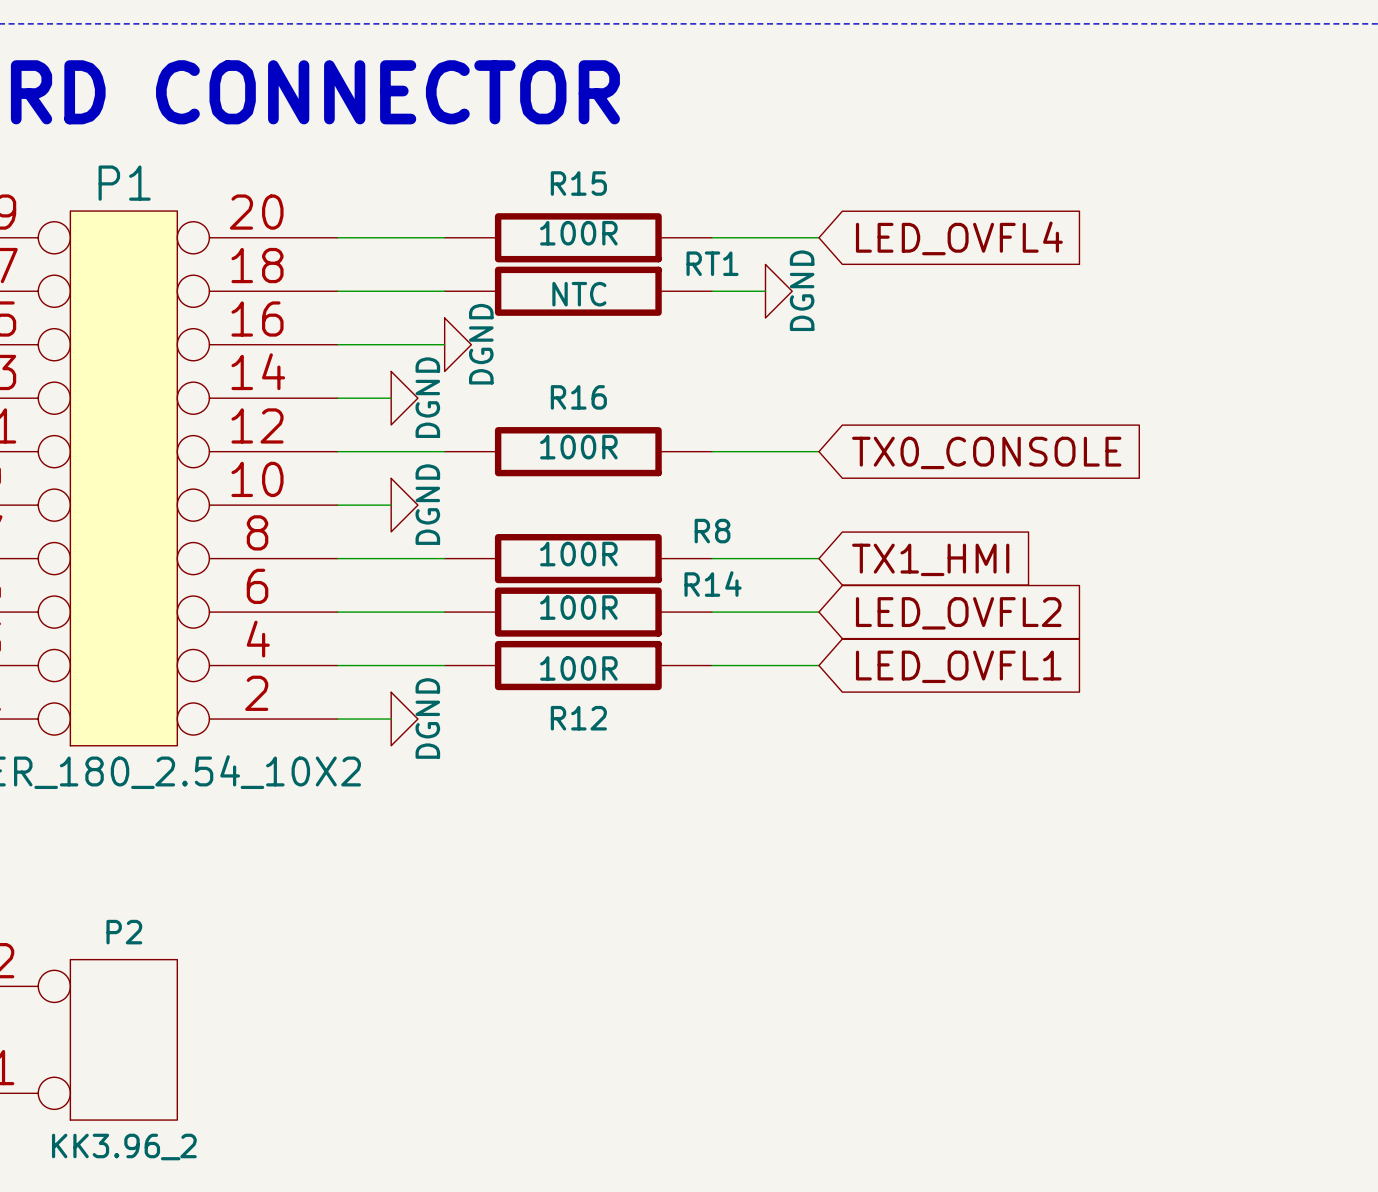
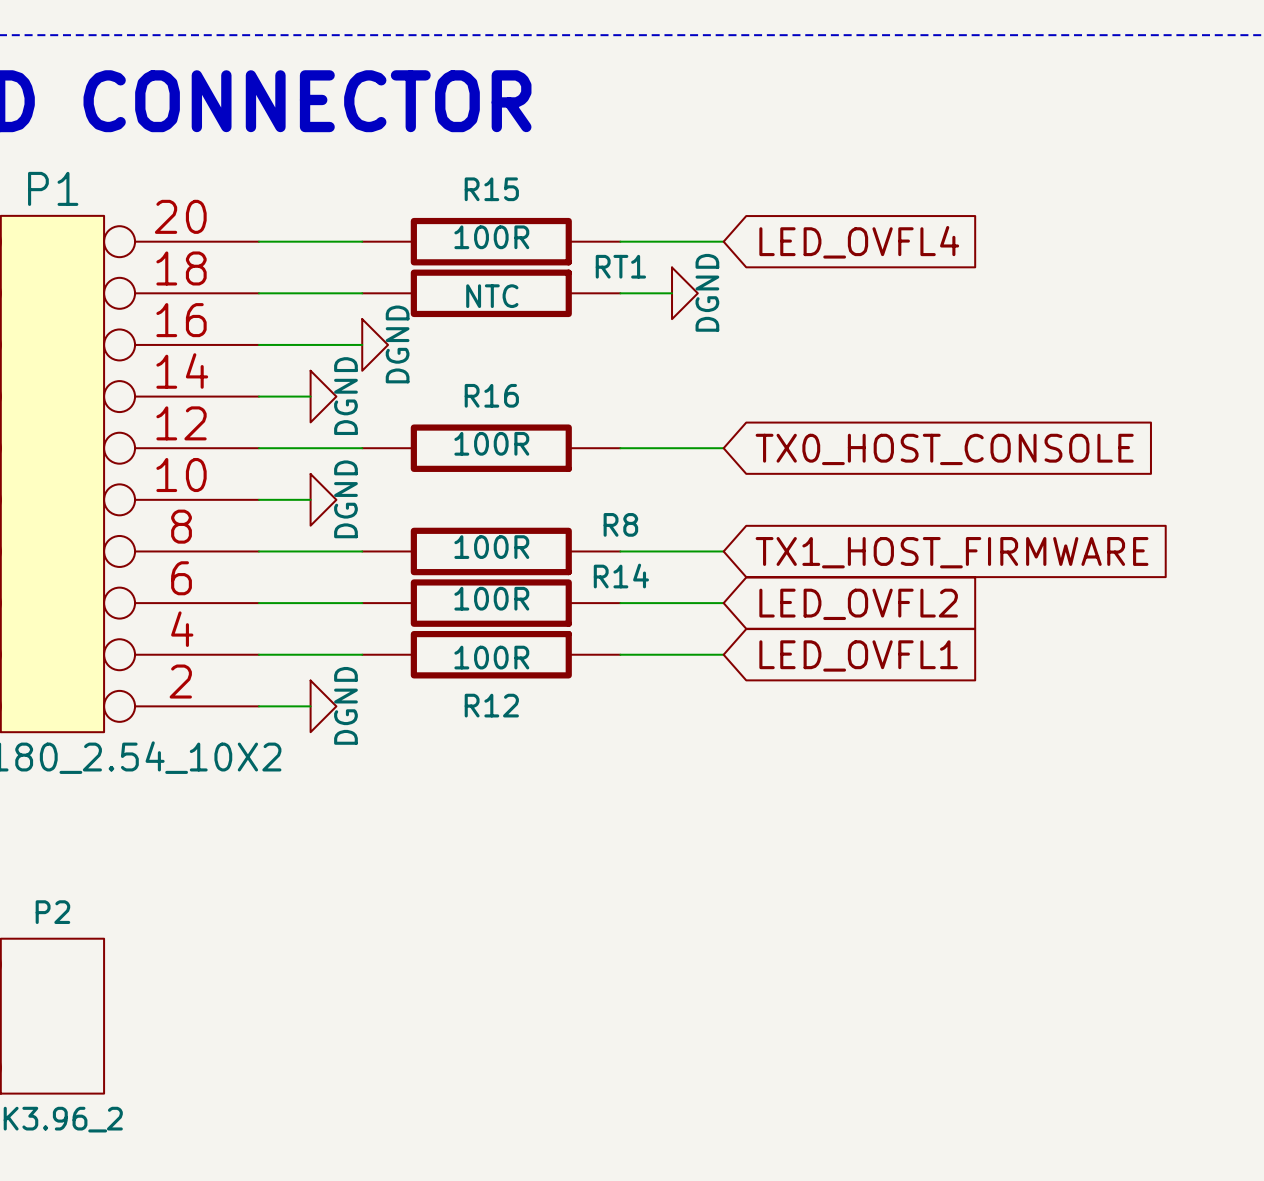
global label: TX0_CONSOLE (986, 452) -> TX0_HOST_CONSOLE (944, 449)
global label: TX1_HMI (930, 559) -> TX1_HOST_FIRMWARE (952, 552)

